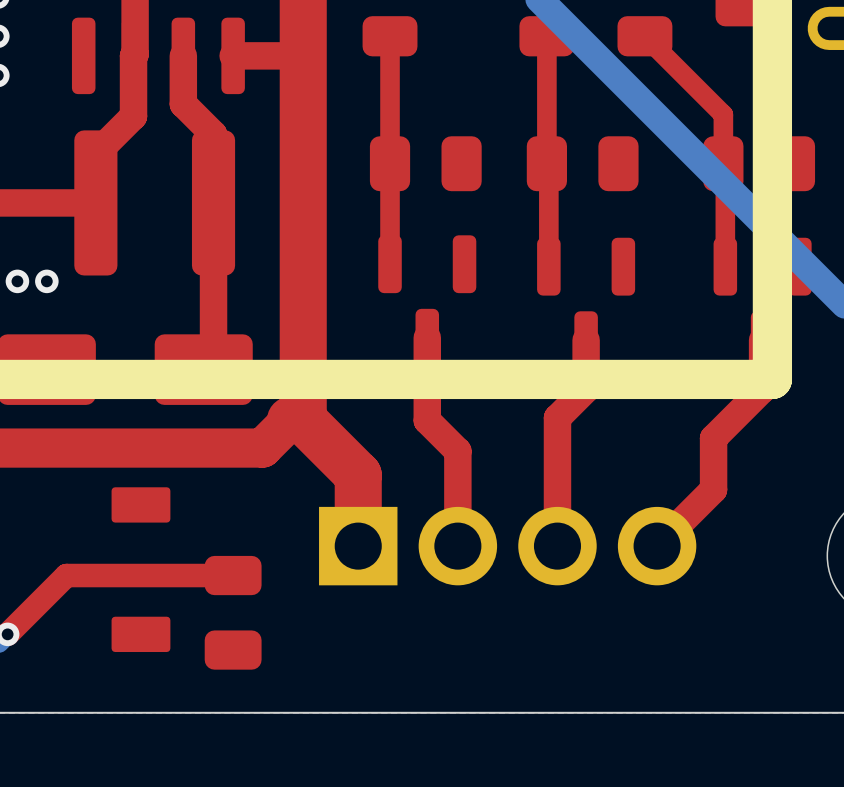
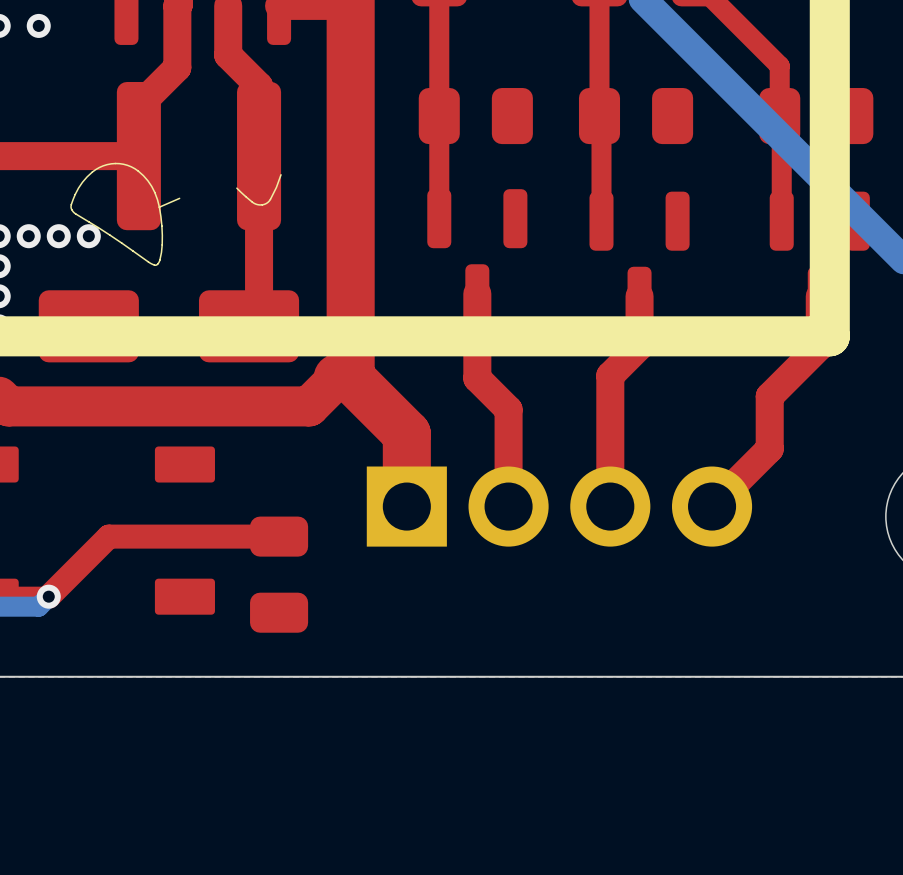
line: none -> (281, 174) (270, 199) (263, 204) (253, 202) (236, 188)
line: none -> (179, 198) (159, 207)
line: none -> (159, 207) (162, 244) (159, 261) (155, 265) (74, 213) (71, 206) (78, 188) (87, 176) (99, 167) (115, 163) (131, 166) (143, 175) (154, 192) (159, 207)

